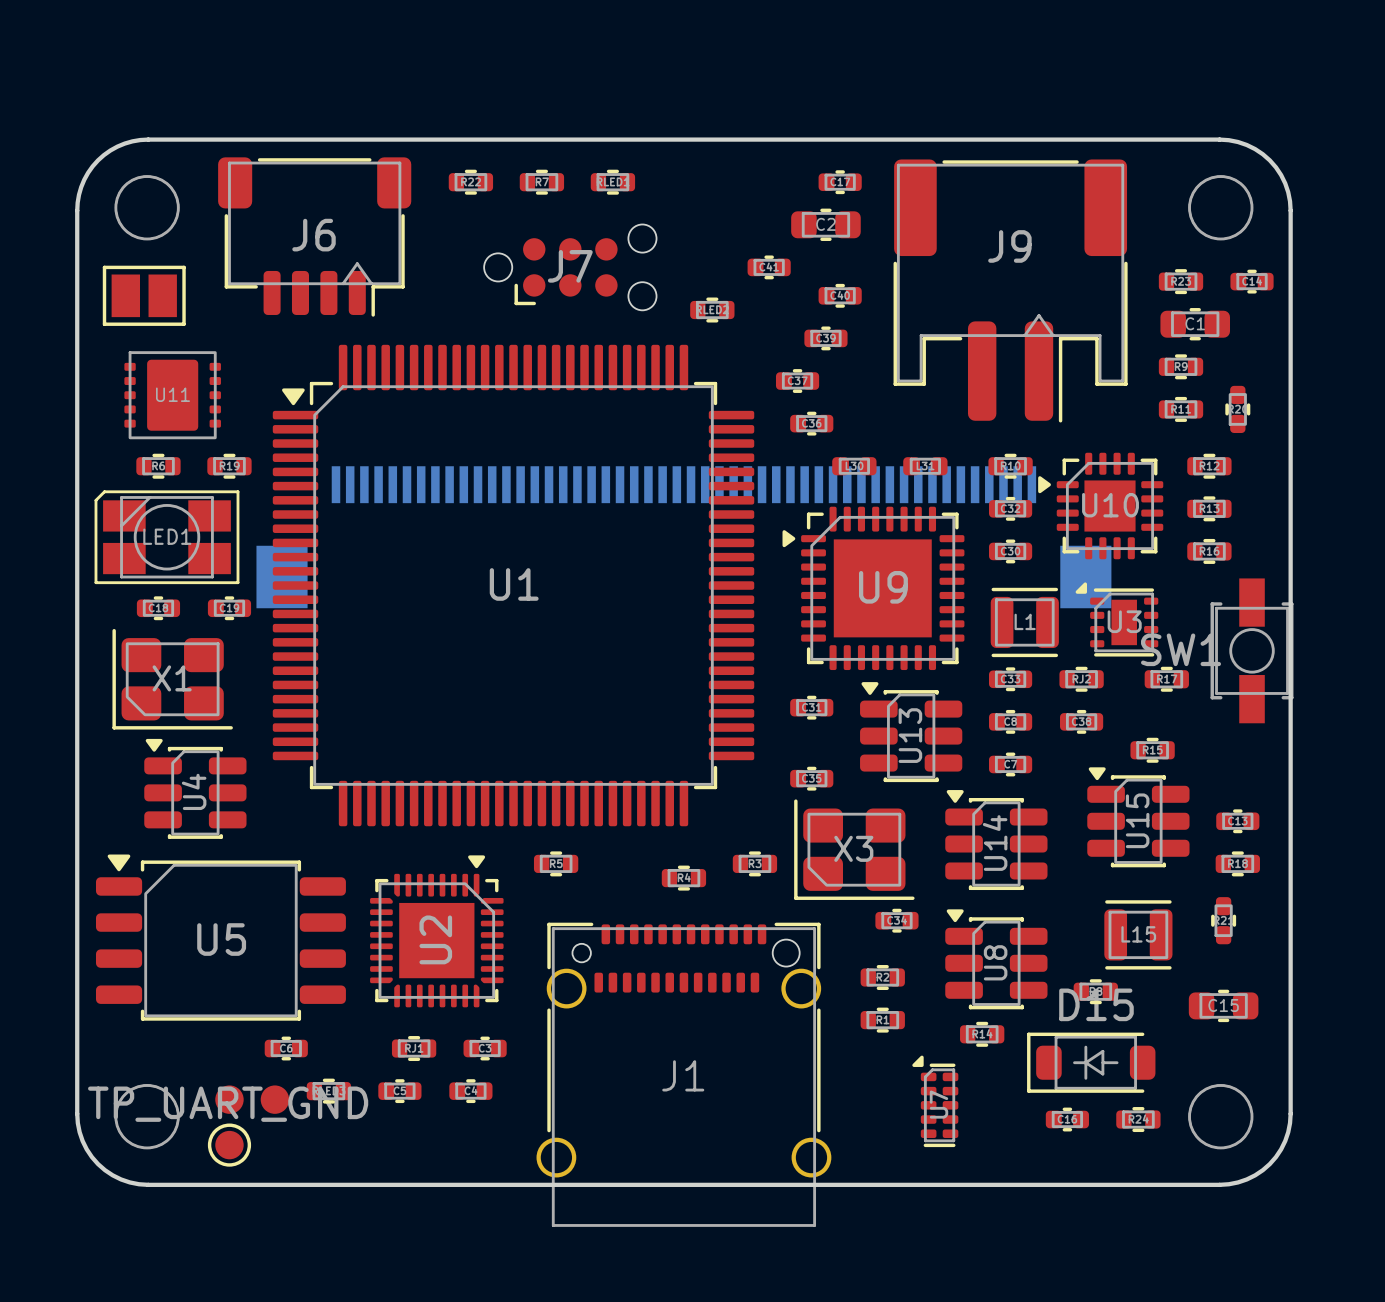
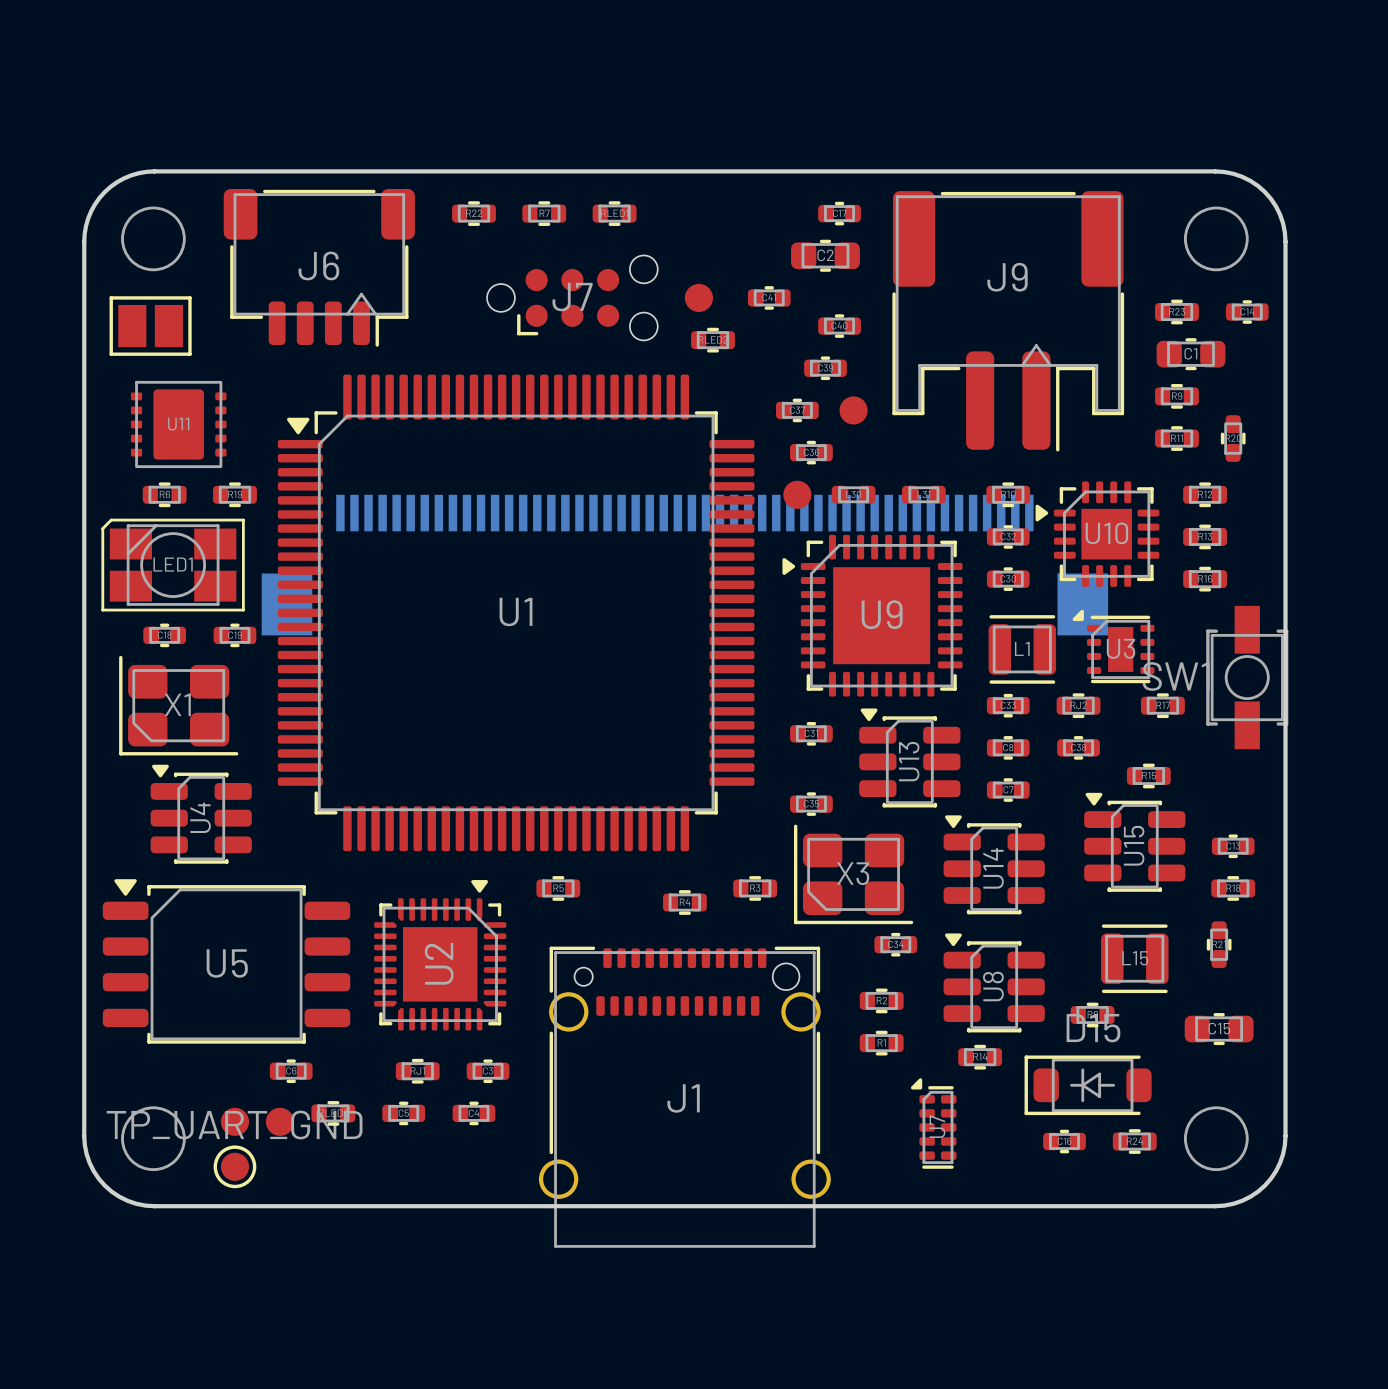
part: none -> (698, 297)
part: none -> (853, 410)
part: none -> (797, 494)

